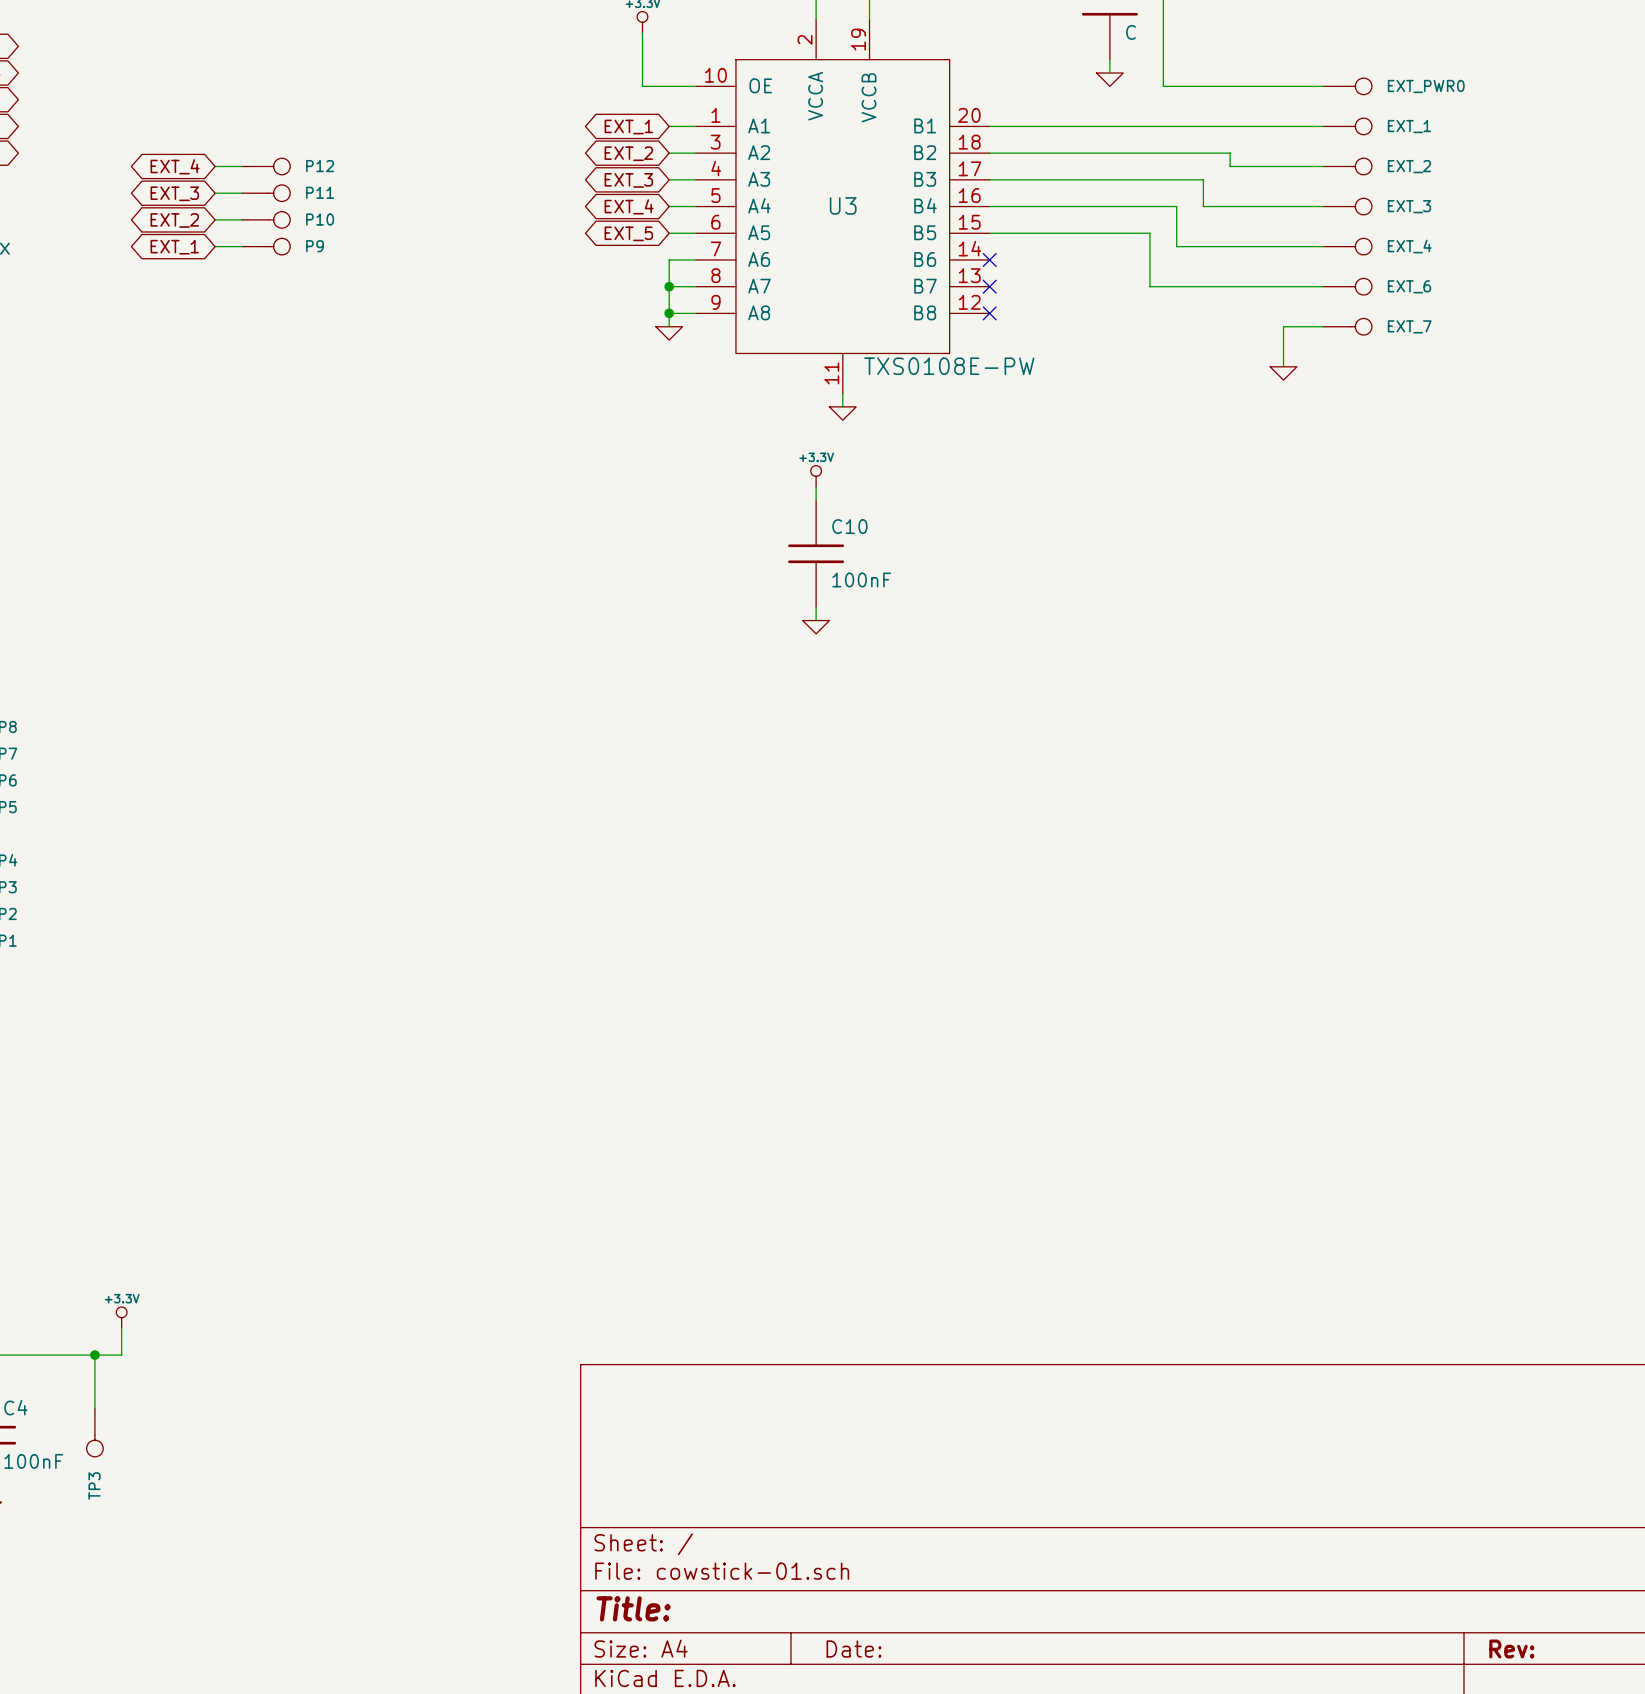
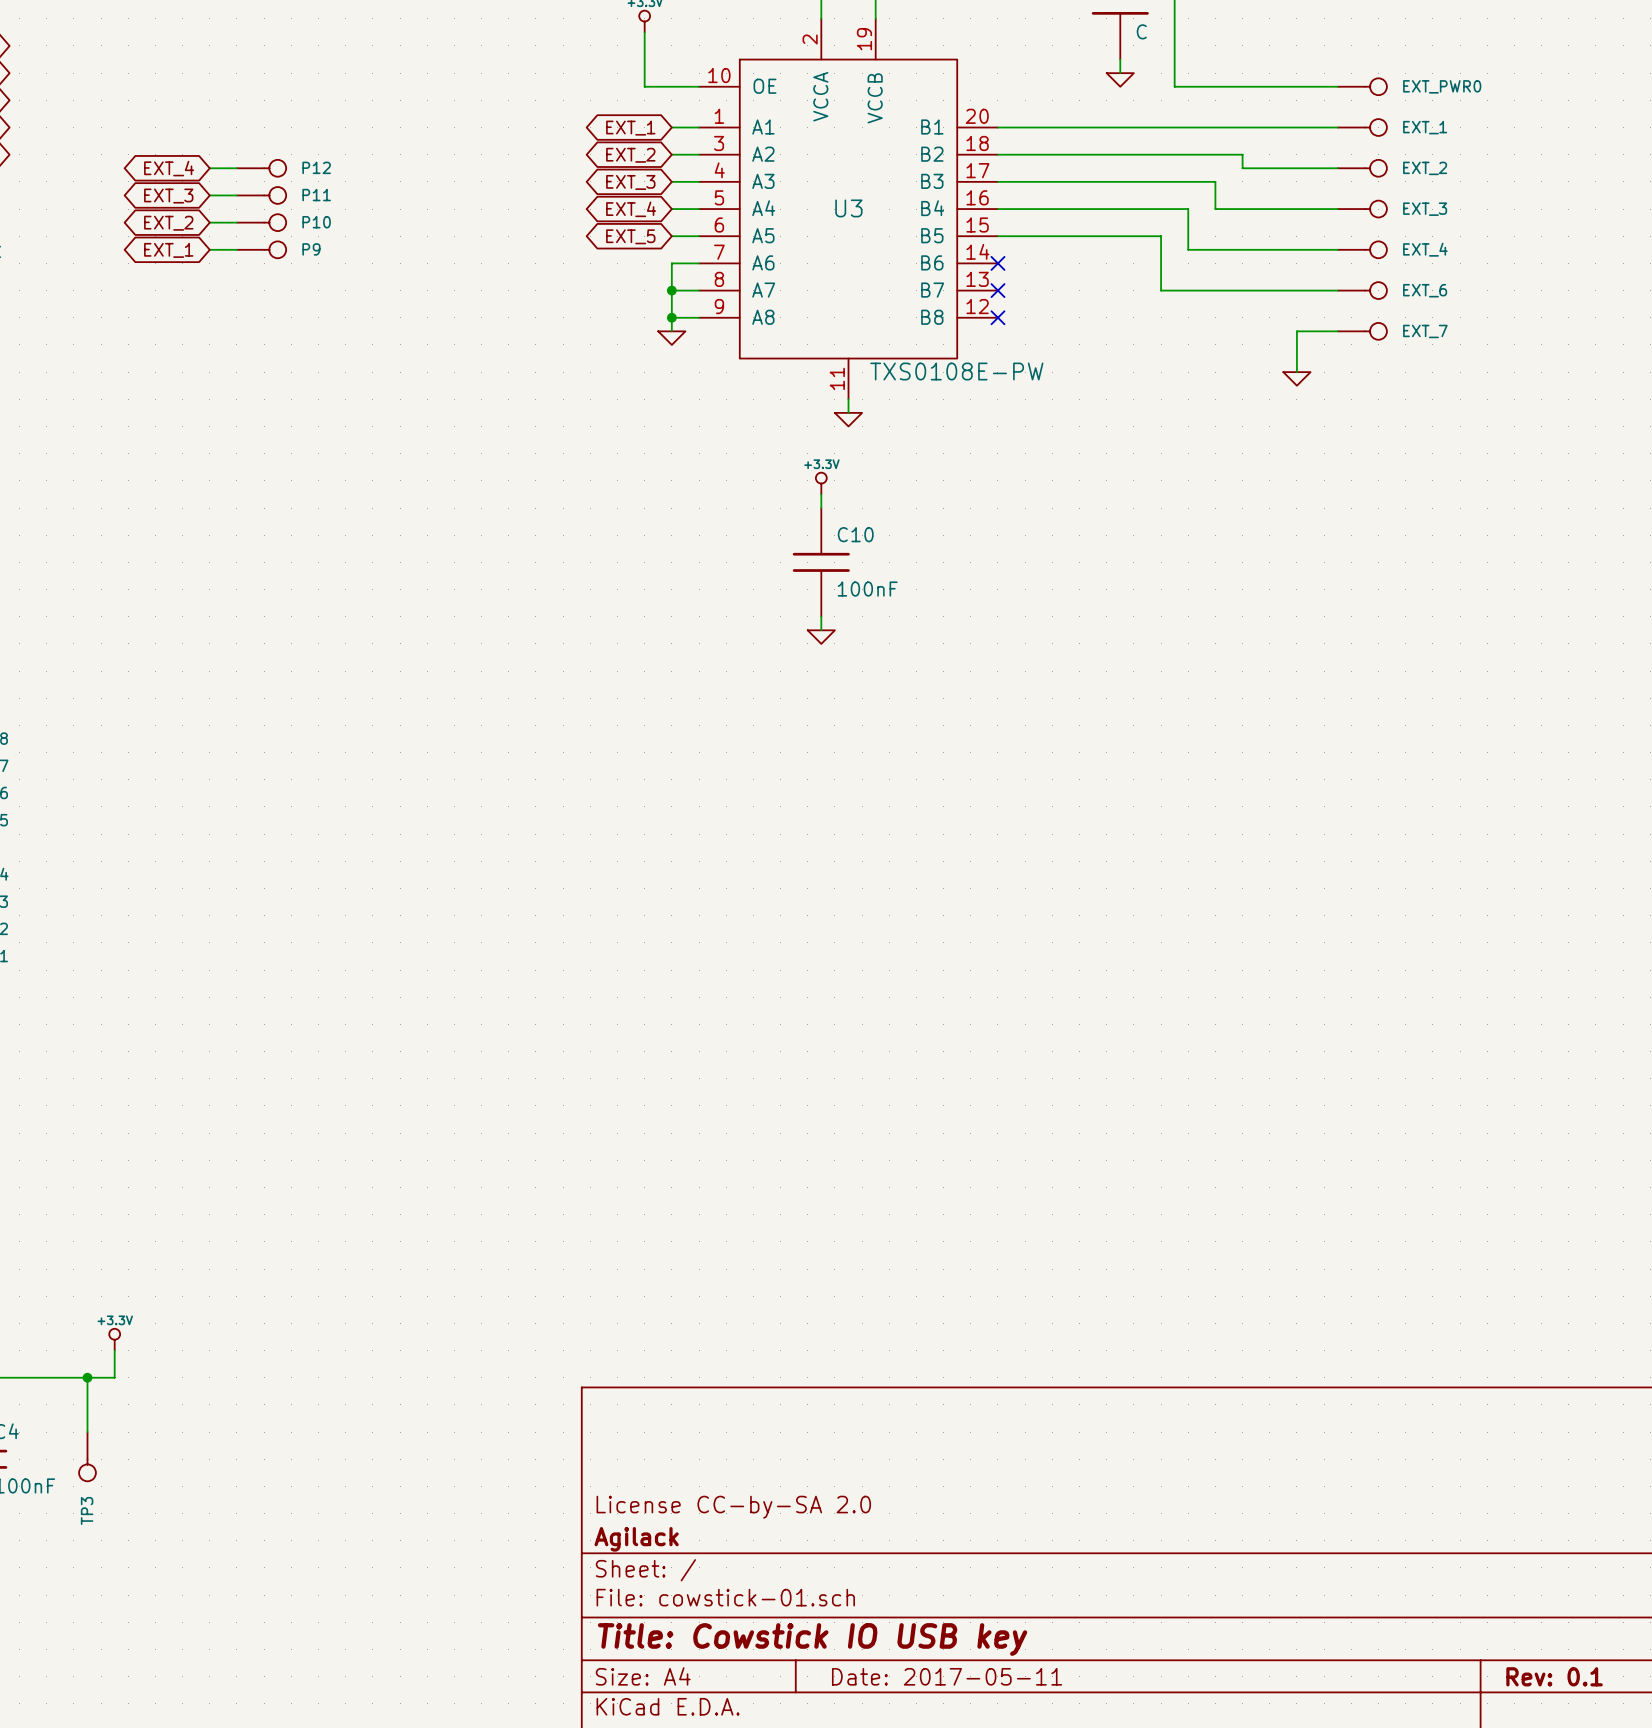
title block: none -> License CC-by-SA 2.0 (733, 1507)
title block: none -> Agilack (636, 1539)
title block: Title: (633, 1608) -> Title: Cowstick IO USB key (812, 1639)
title block: Date: (854, 1648) -> Date: 2017-05-11 (947, 1676)
title block: Rev: (1511, 1648) -> Rev: 0.1 (1554, 1676)

